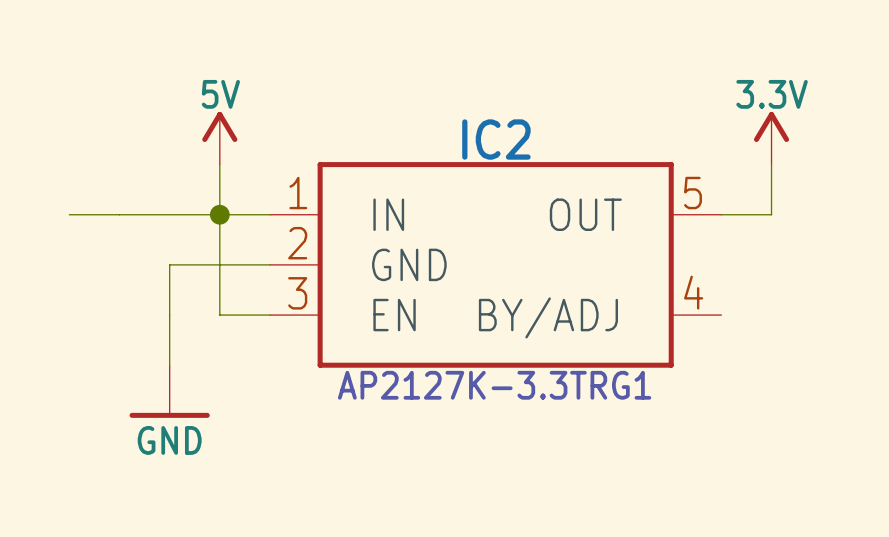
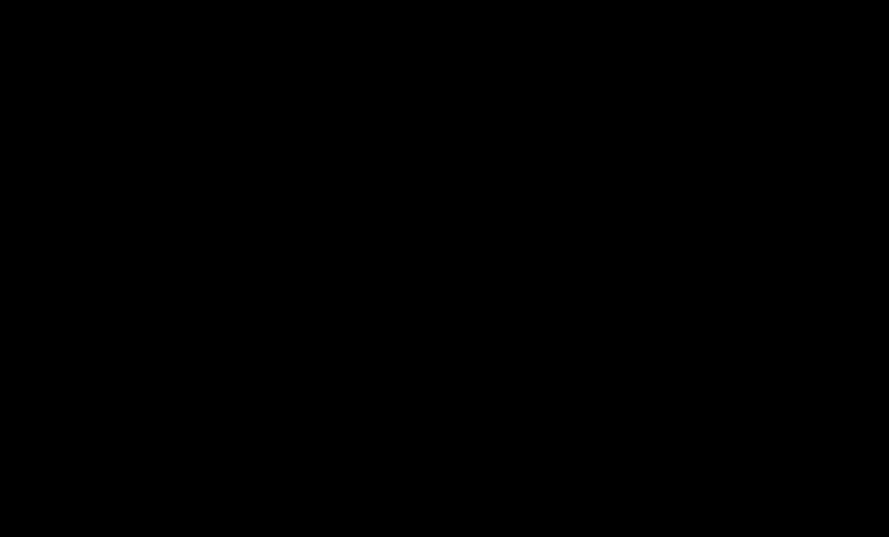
power symbol: 5V (219, 138) -> none
power symbol: 3.3V (771, 138) -> none
wire: (219, 164) (219, 315) (269, 315) -> none
wire: (771, 164) (771, 214) (721, 214) -> none
wire: (69, 214) (269, 214) -> none
junction: (219, 214) -> none
wire: (269, 264) (169, 264) (169, 365) -> none
IC2: (495, 264) -> none
power symbol: GND (169, 391) -> none

